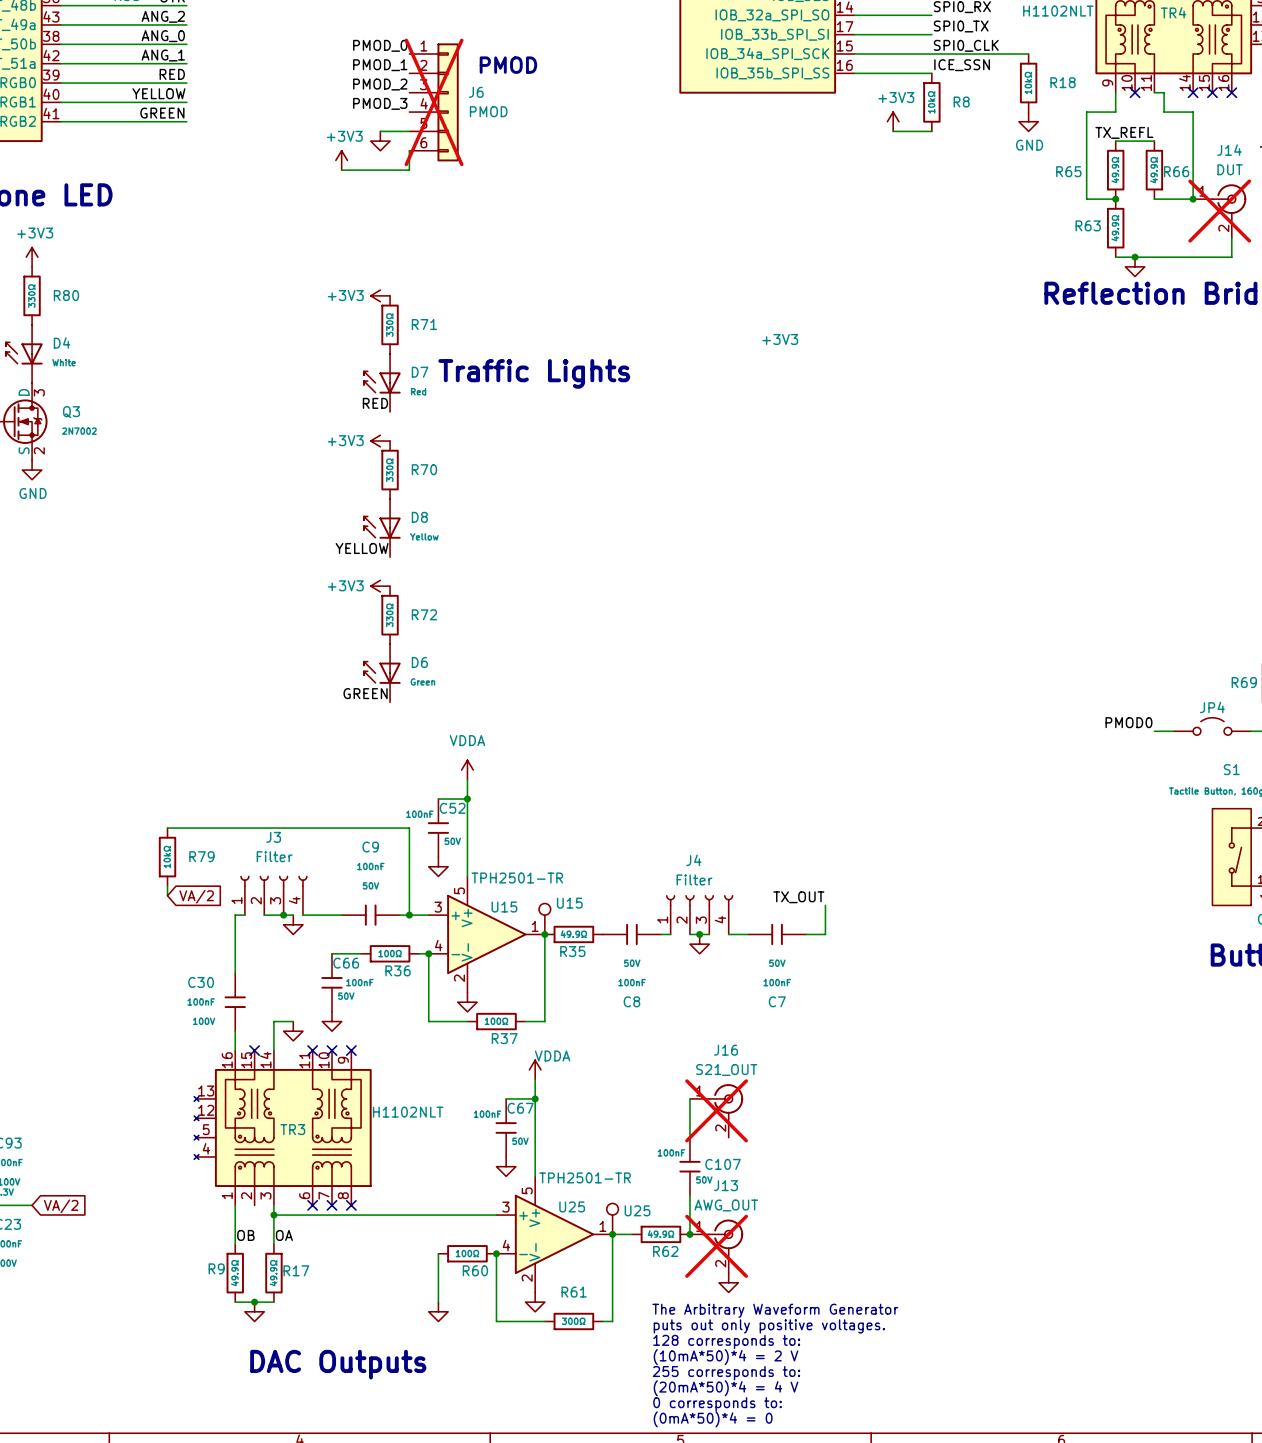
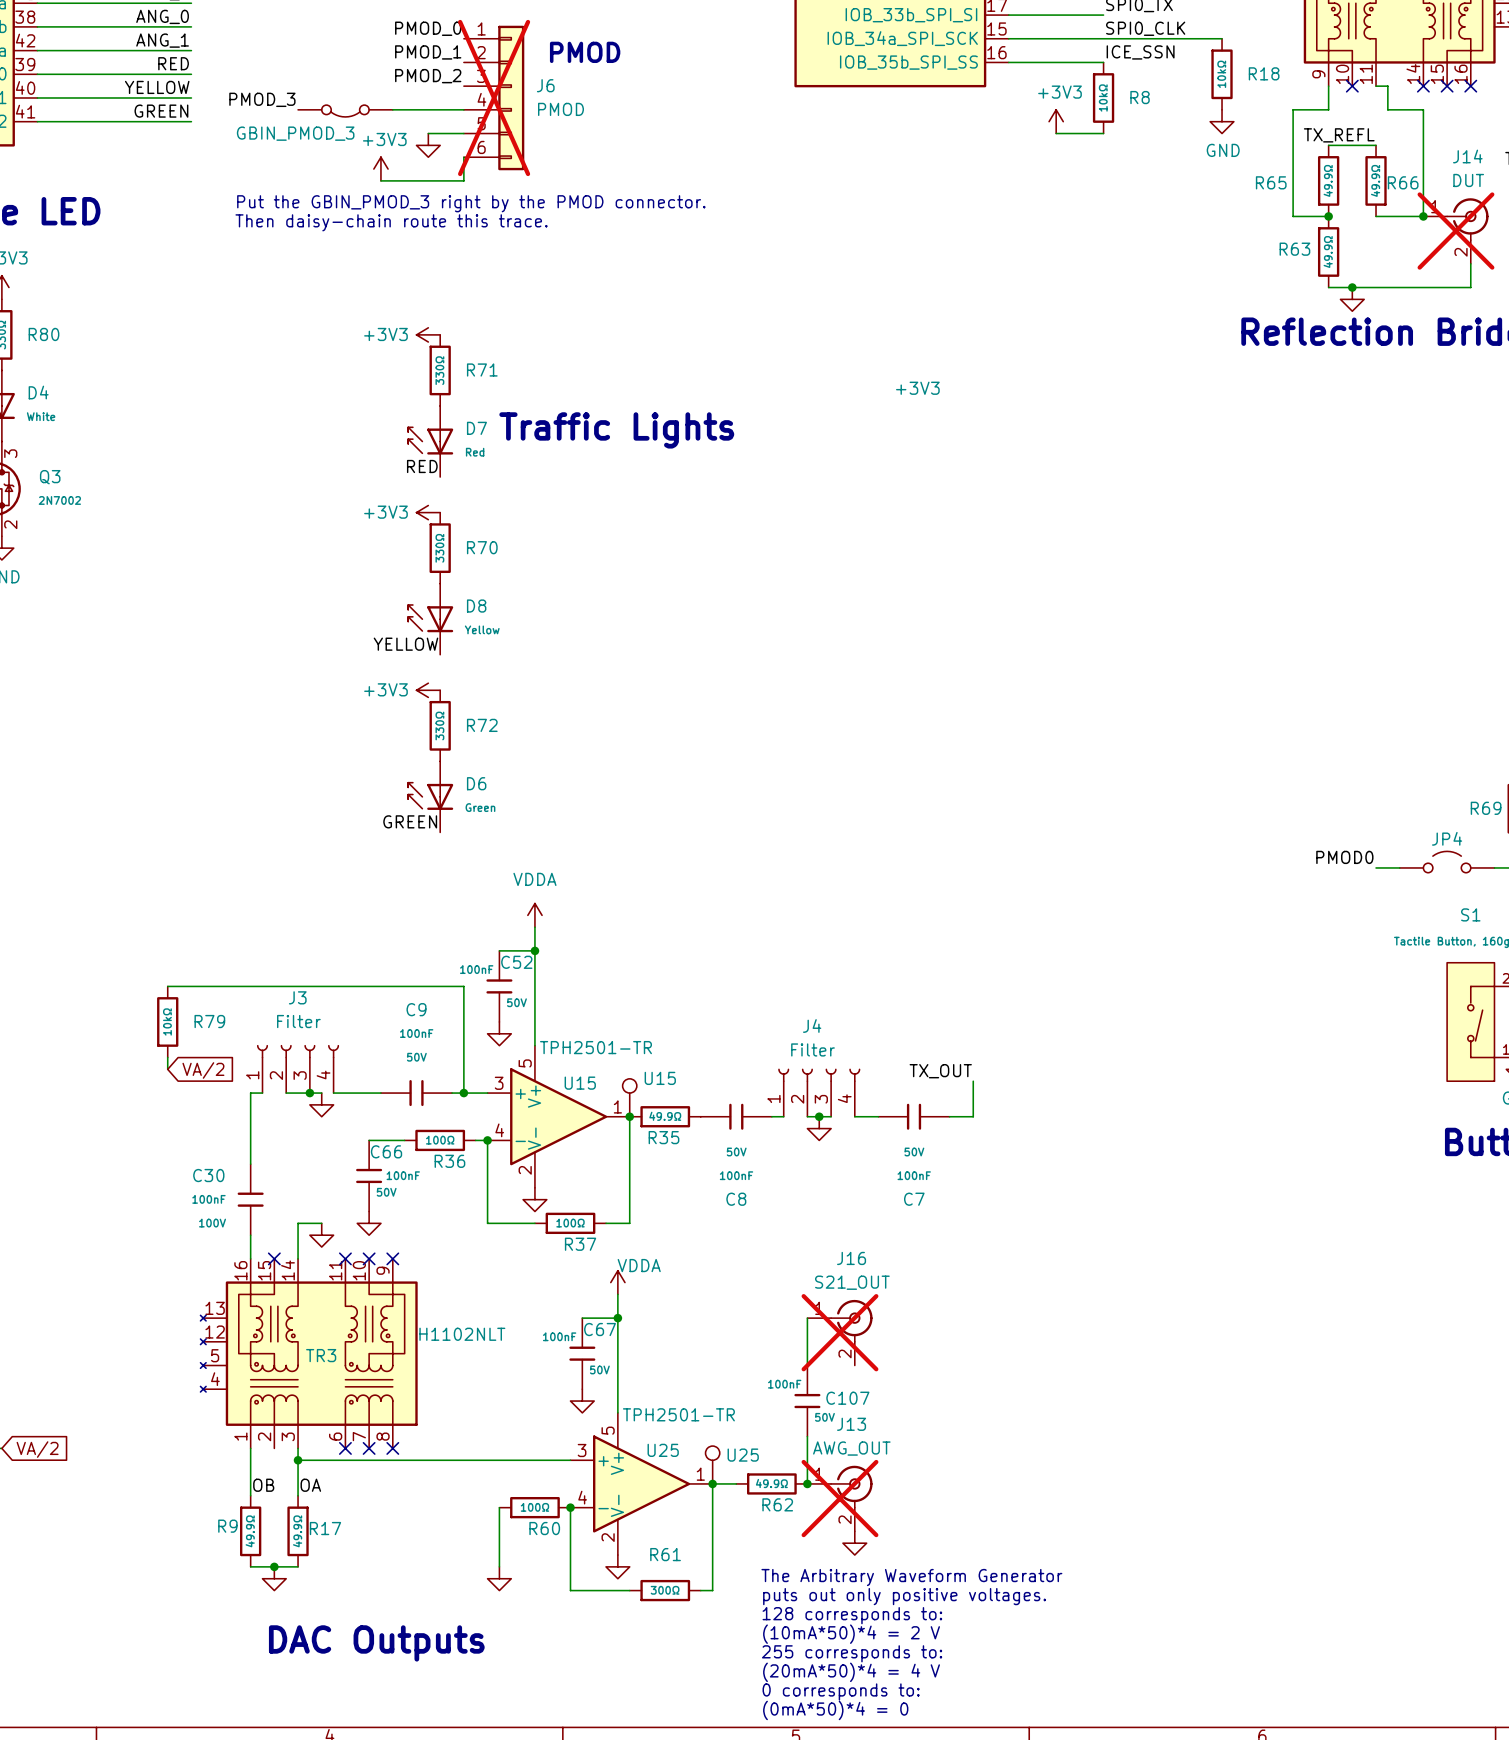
label position: PMOD_3 (380, 103) -> PMOD_3 (262, 99)
wire: none -> (392, 109) (463, 109)
part: none -> GBIN_PMOD_3 (345, 111)
text: none -> Put the GBIN_PMOD_3 right by the PMOD connector. (471, 203)
text: none -> Then daisy-chain route this trace. (391, 222)

